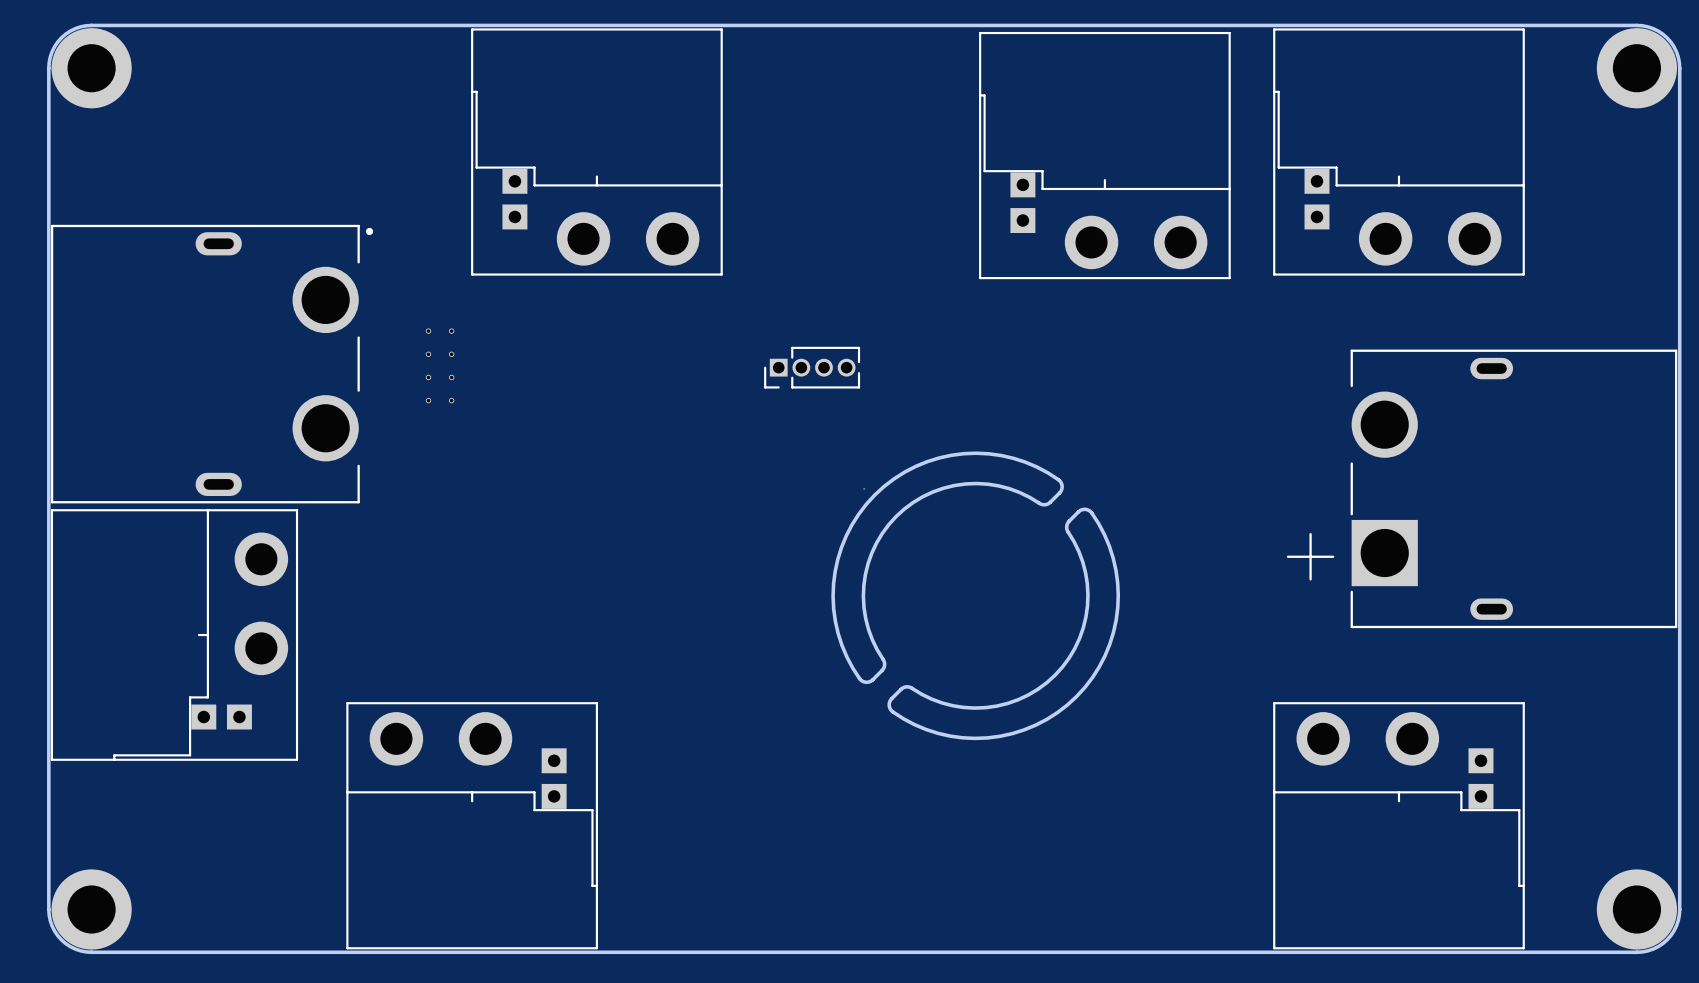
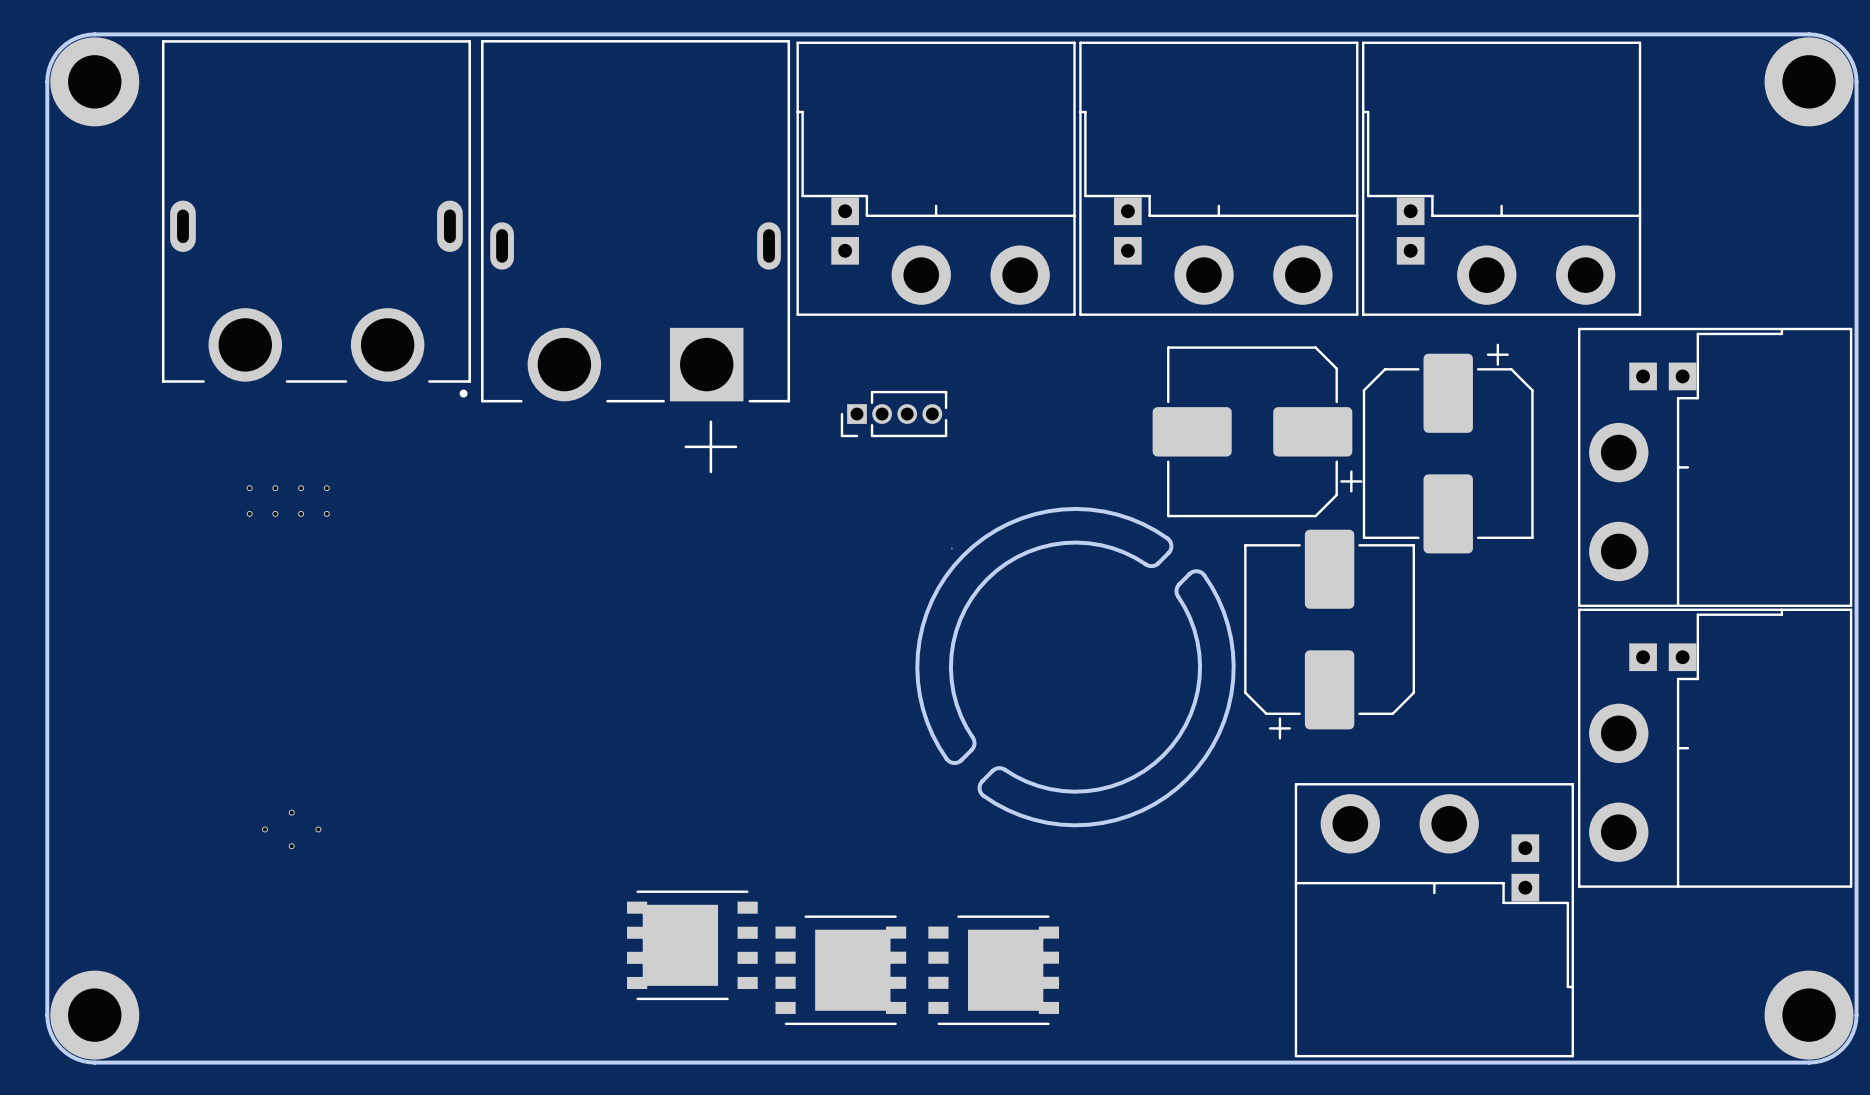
part position: (596, 151) -> (936, 178)
part position: (1398, 151) -> (1501, 178)
part: none -> (635, 256)
part rotation: 0° (212, 364) -> 90° clockwise (316, 218)
part rotation: 0° (440, 365) -> 90° clockwise (288, 501)
part position: (440, 365) -> (288, 501)
part: none -> (1257, 431)
part: none -> (1448, 448)
part: none -> (1715, 467)
part: (1482, 488) -> none
part: none -> (1329, 634)
part: (174, 635) -> none
part: none -> (1715, 748)
part: none -> (291, 829)
part: (472, 825) -> none
part position: (1398, 825) -> (1434, 920)
part: none -> (692, 945)
part: none -> (840, 970)
part: none -> (993, 970)

